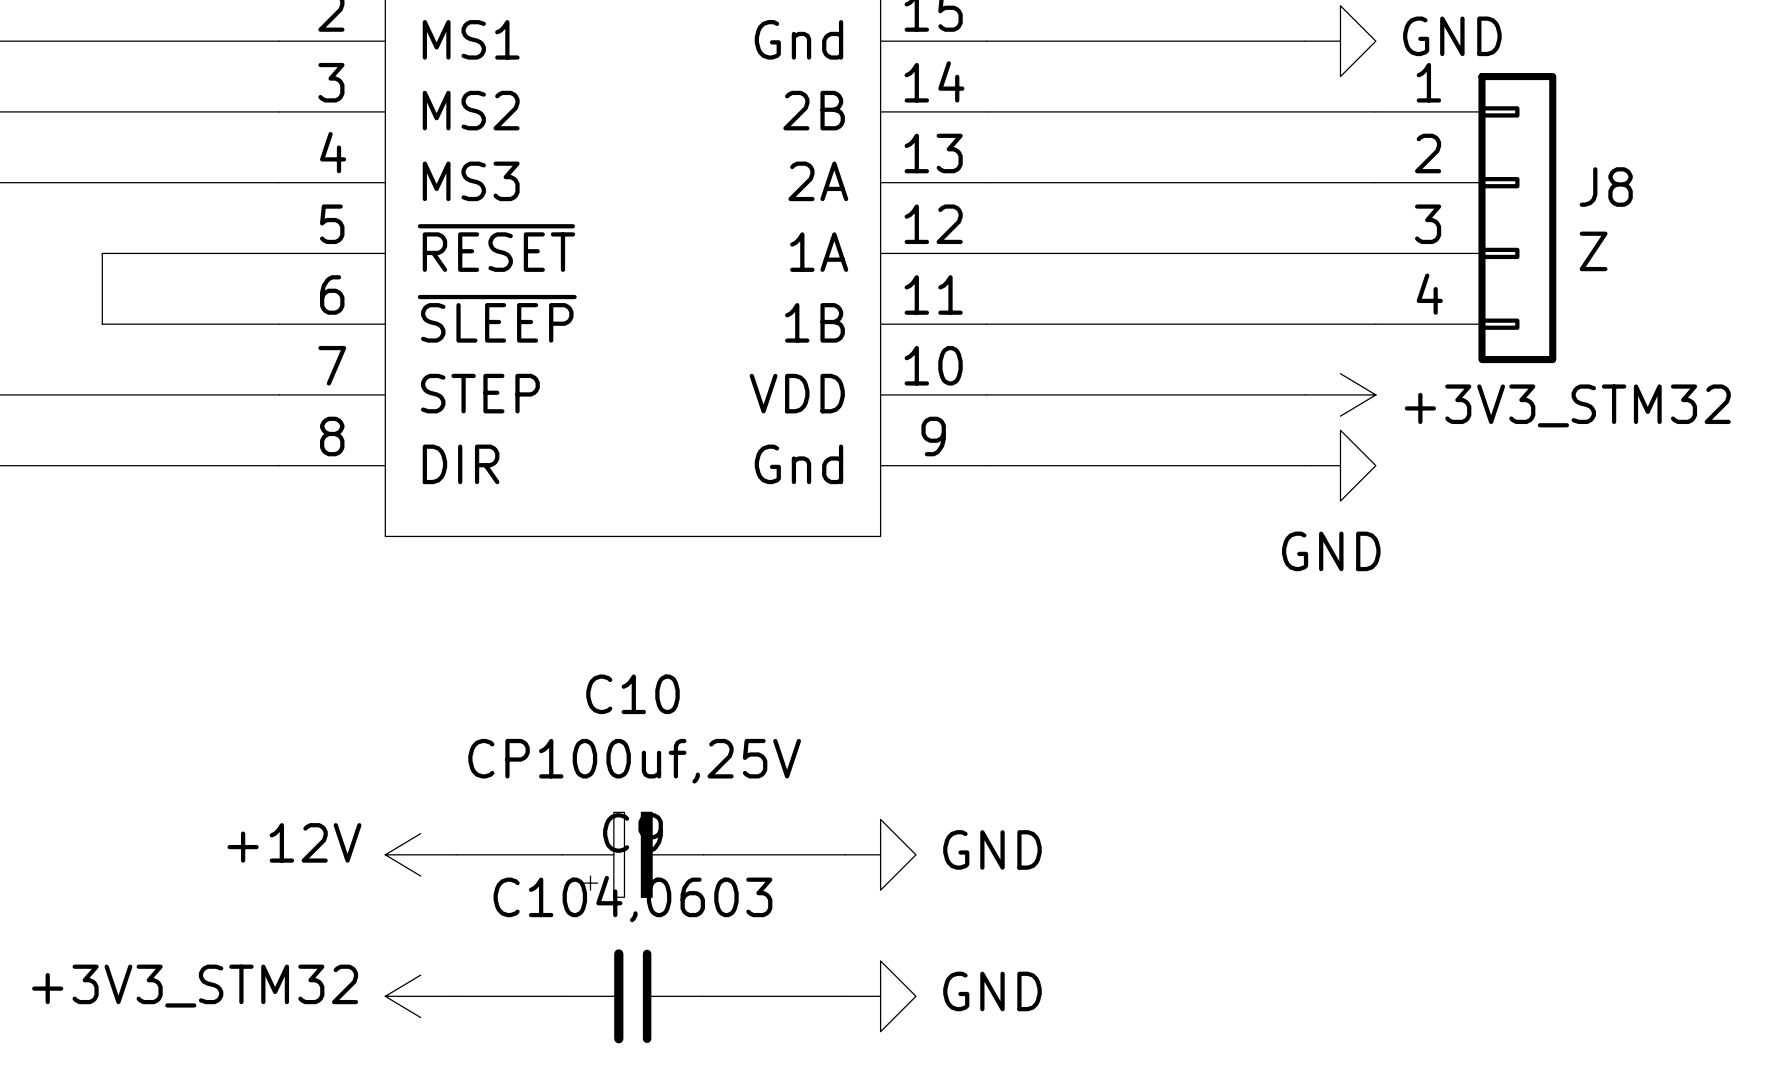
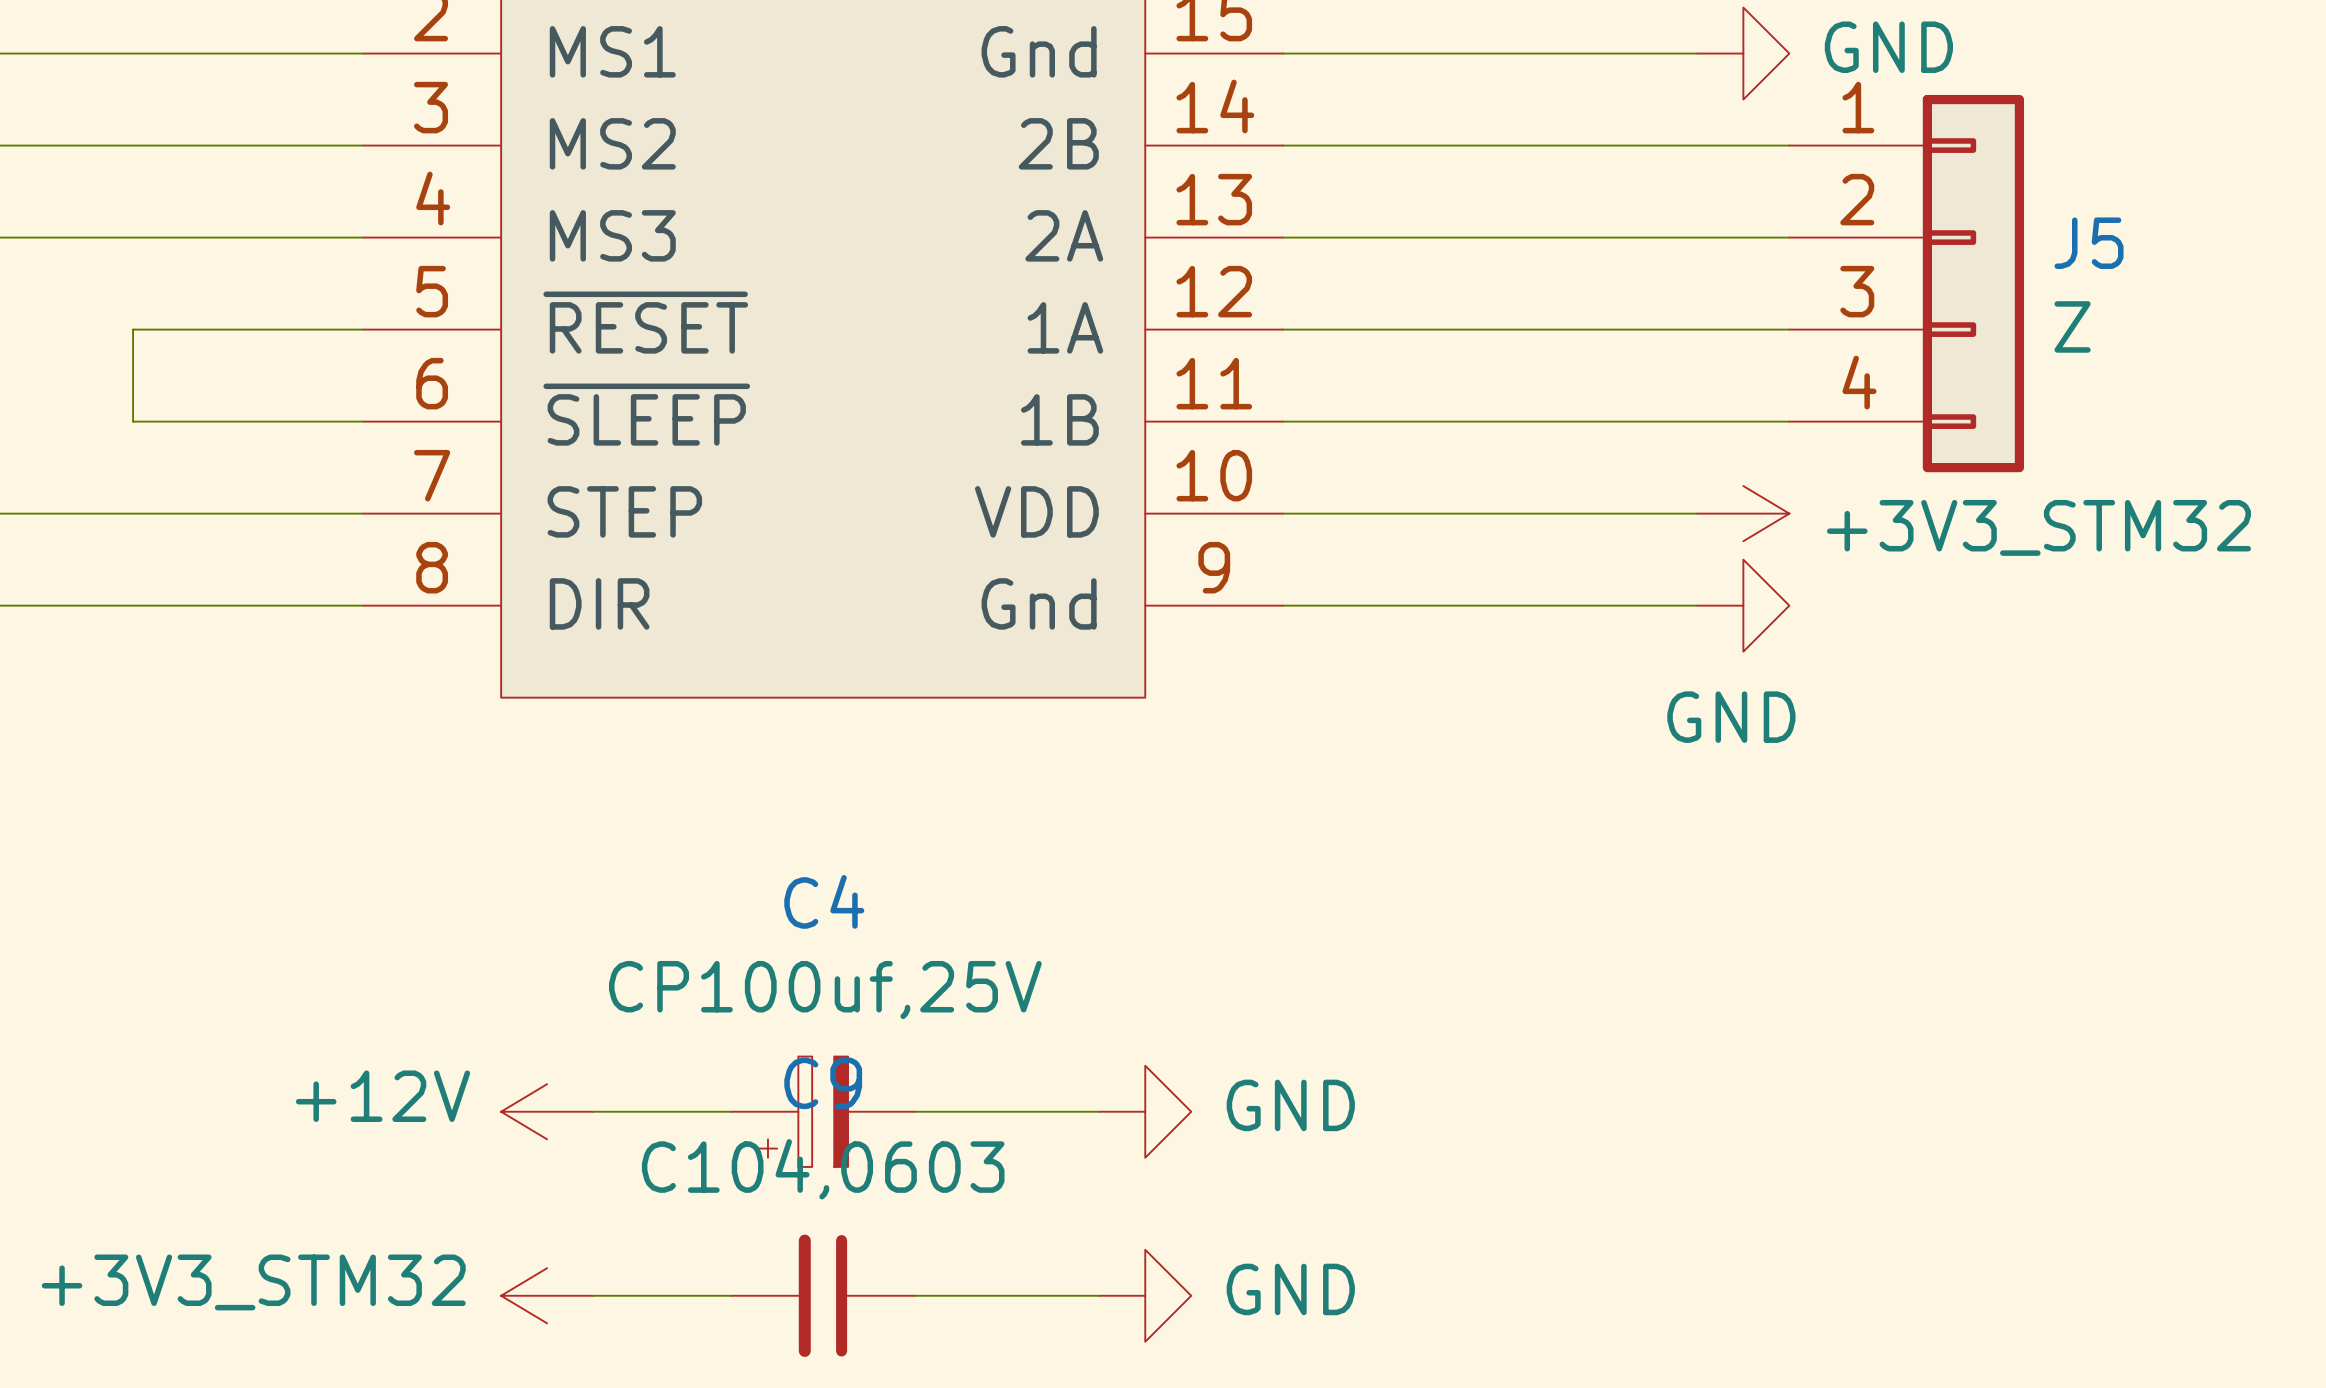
J8 name: J8 (1606, 187) -> J5 (2089, 243)
C10 name: C10 (632, 694) -> C4 (824, 901)

